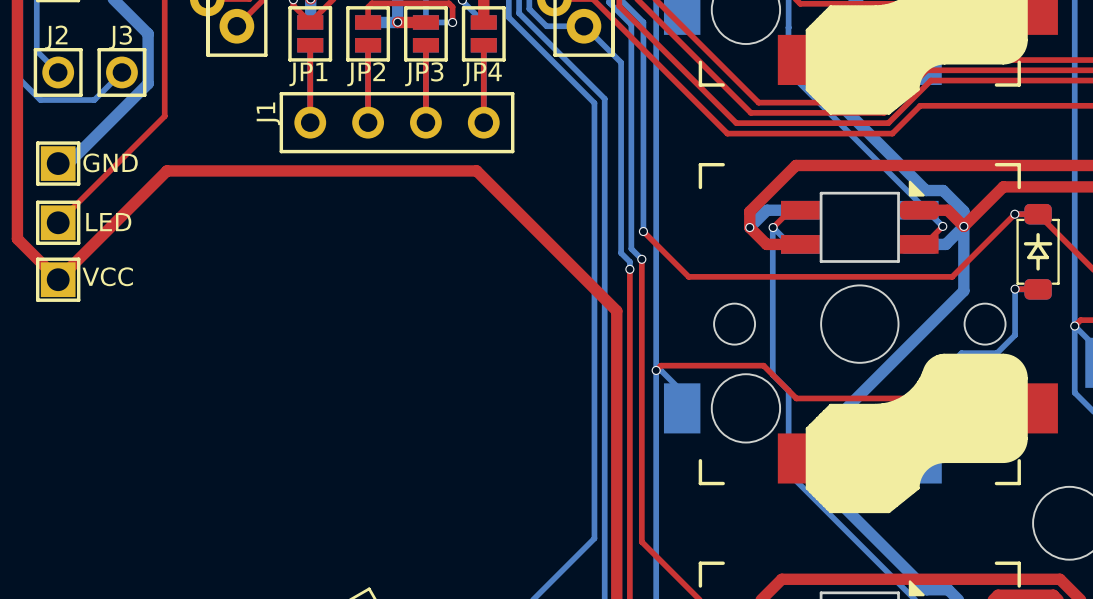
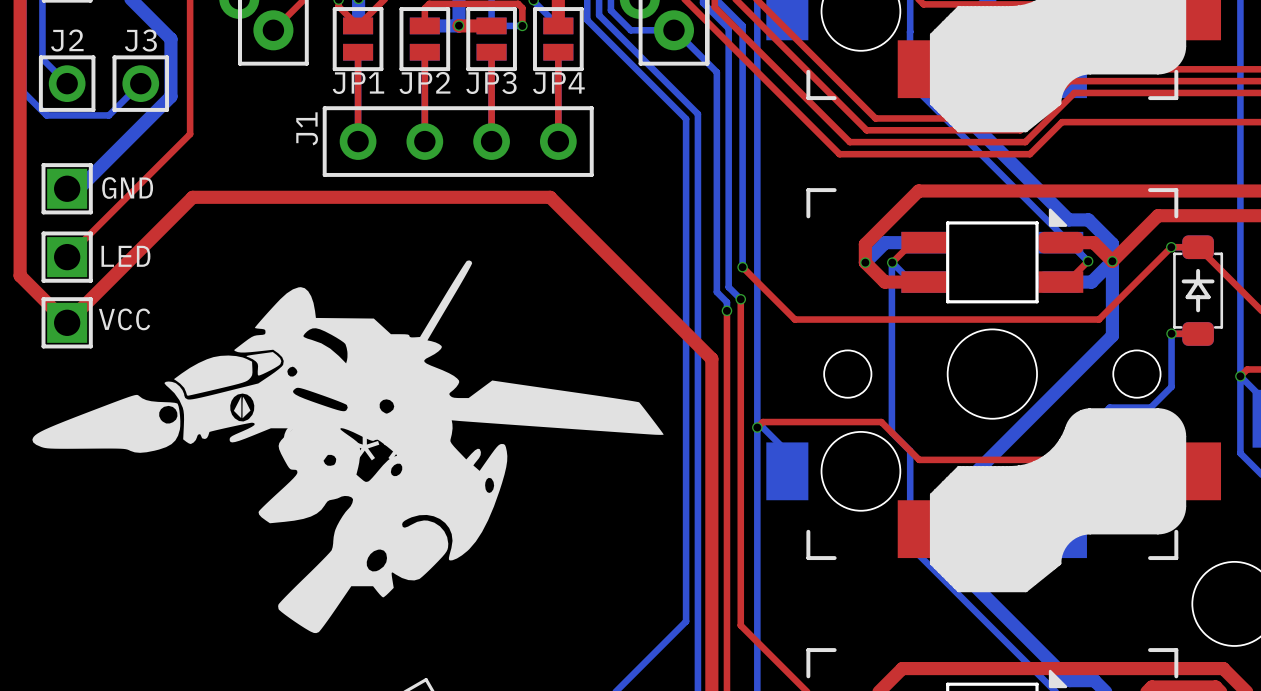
part: none -> (348, 446)

